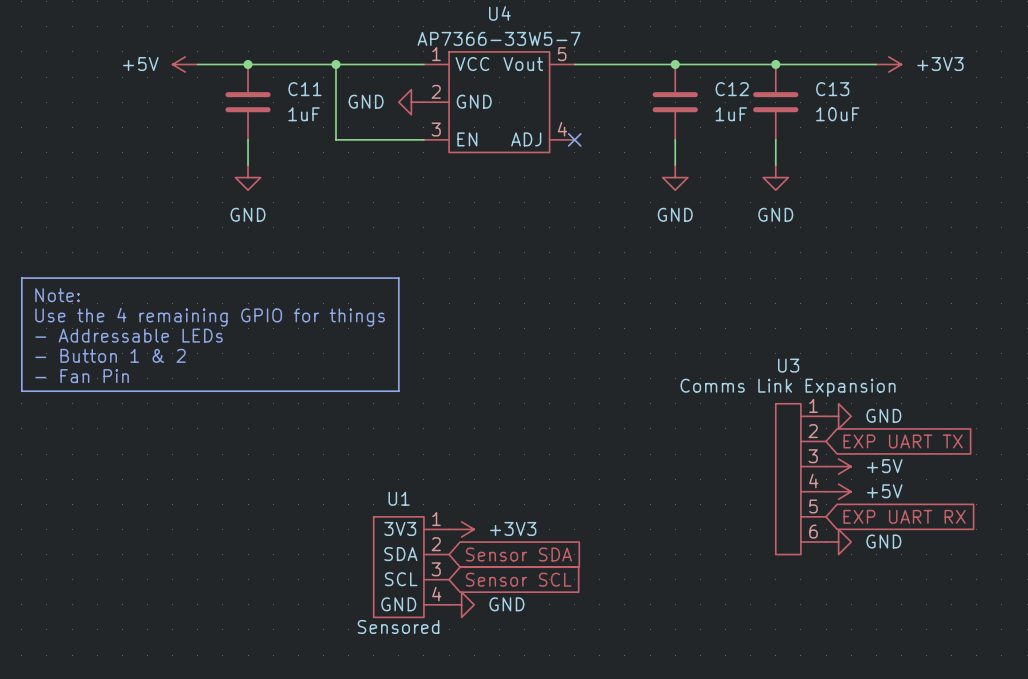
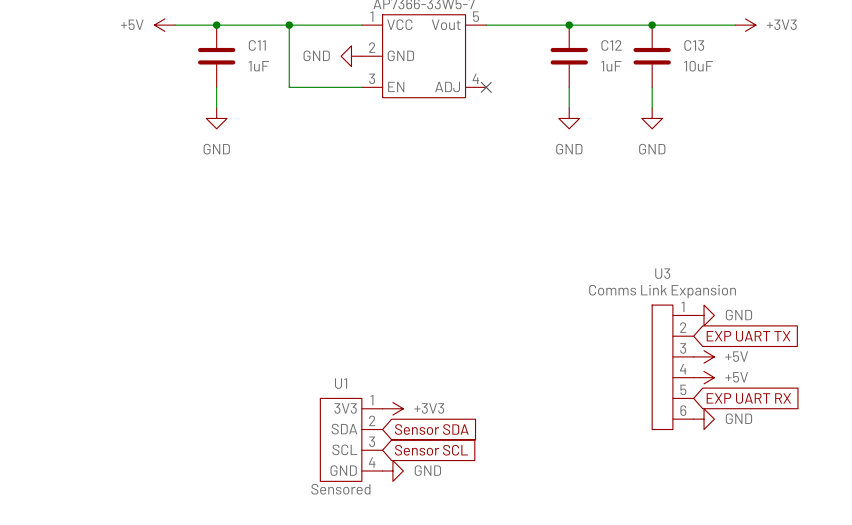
line: (21, 278) (398, 278) (398, 391) (21, 391) (21, 278) -> none
text: Note: (57, 295) -> none
text: Use the 4 remaining GPIO for things (210, 317) -> none
text: - Addressable LEDs (129, 335) -> none
text: - Button 1 & 2 (110, 355) -> none
text: - Fan Pin (82, 376) -> none

